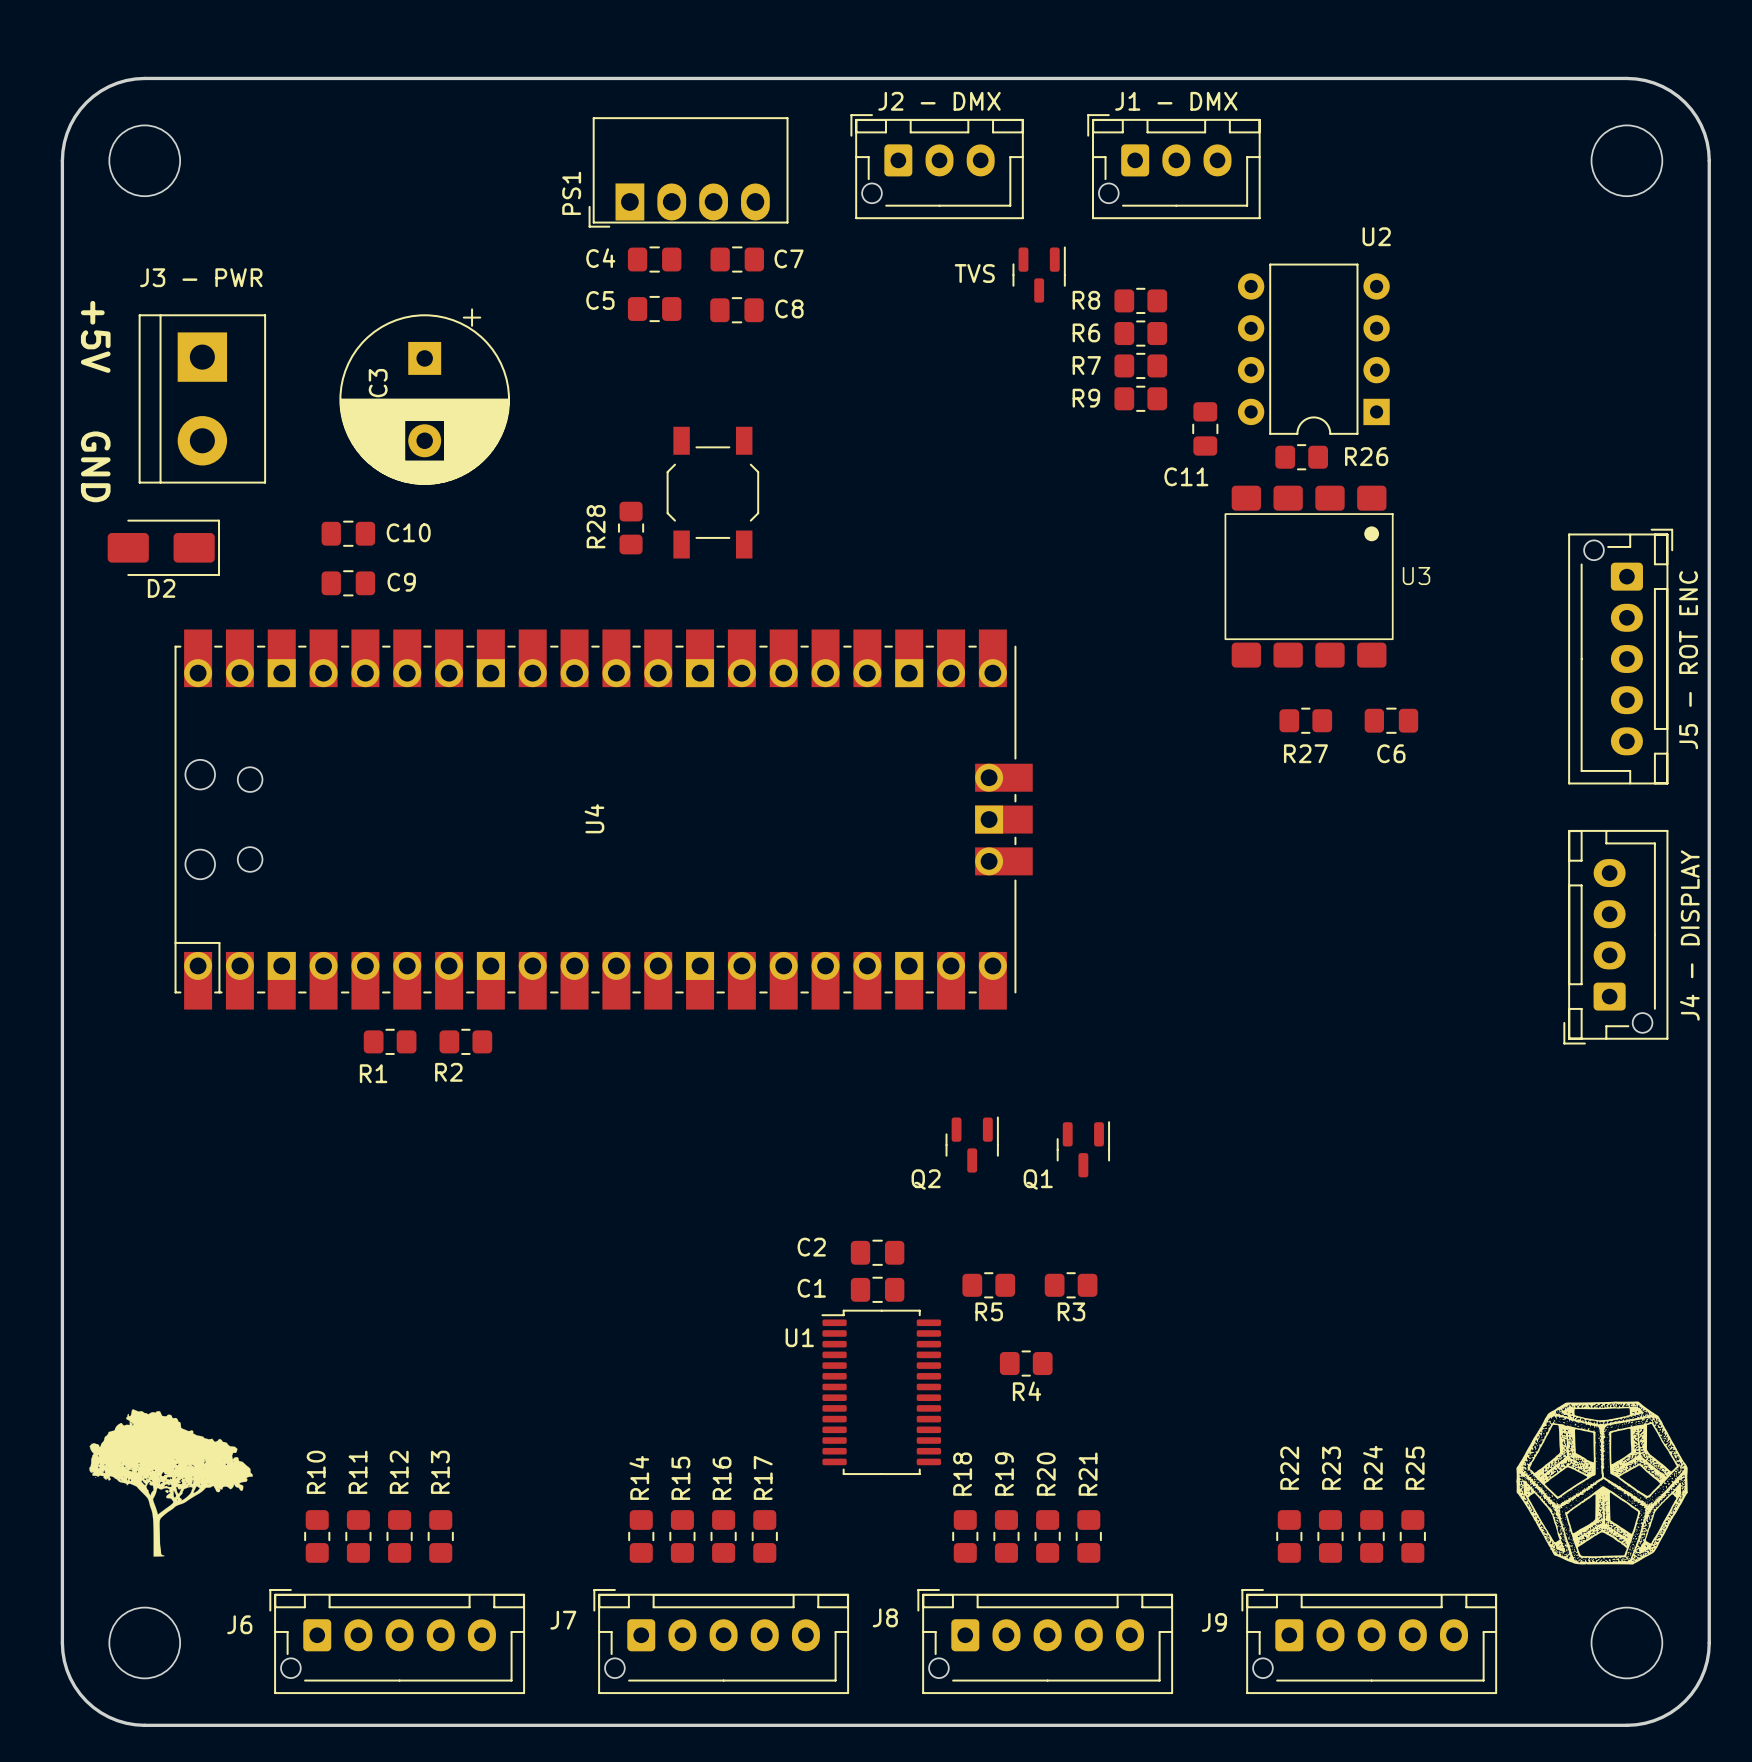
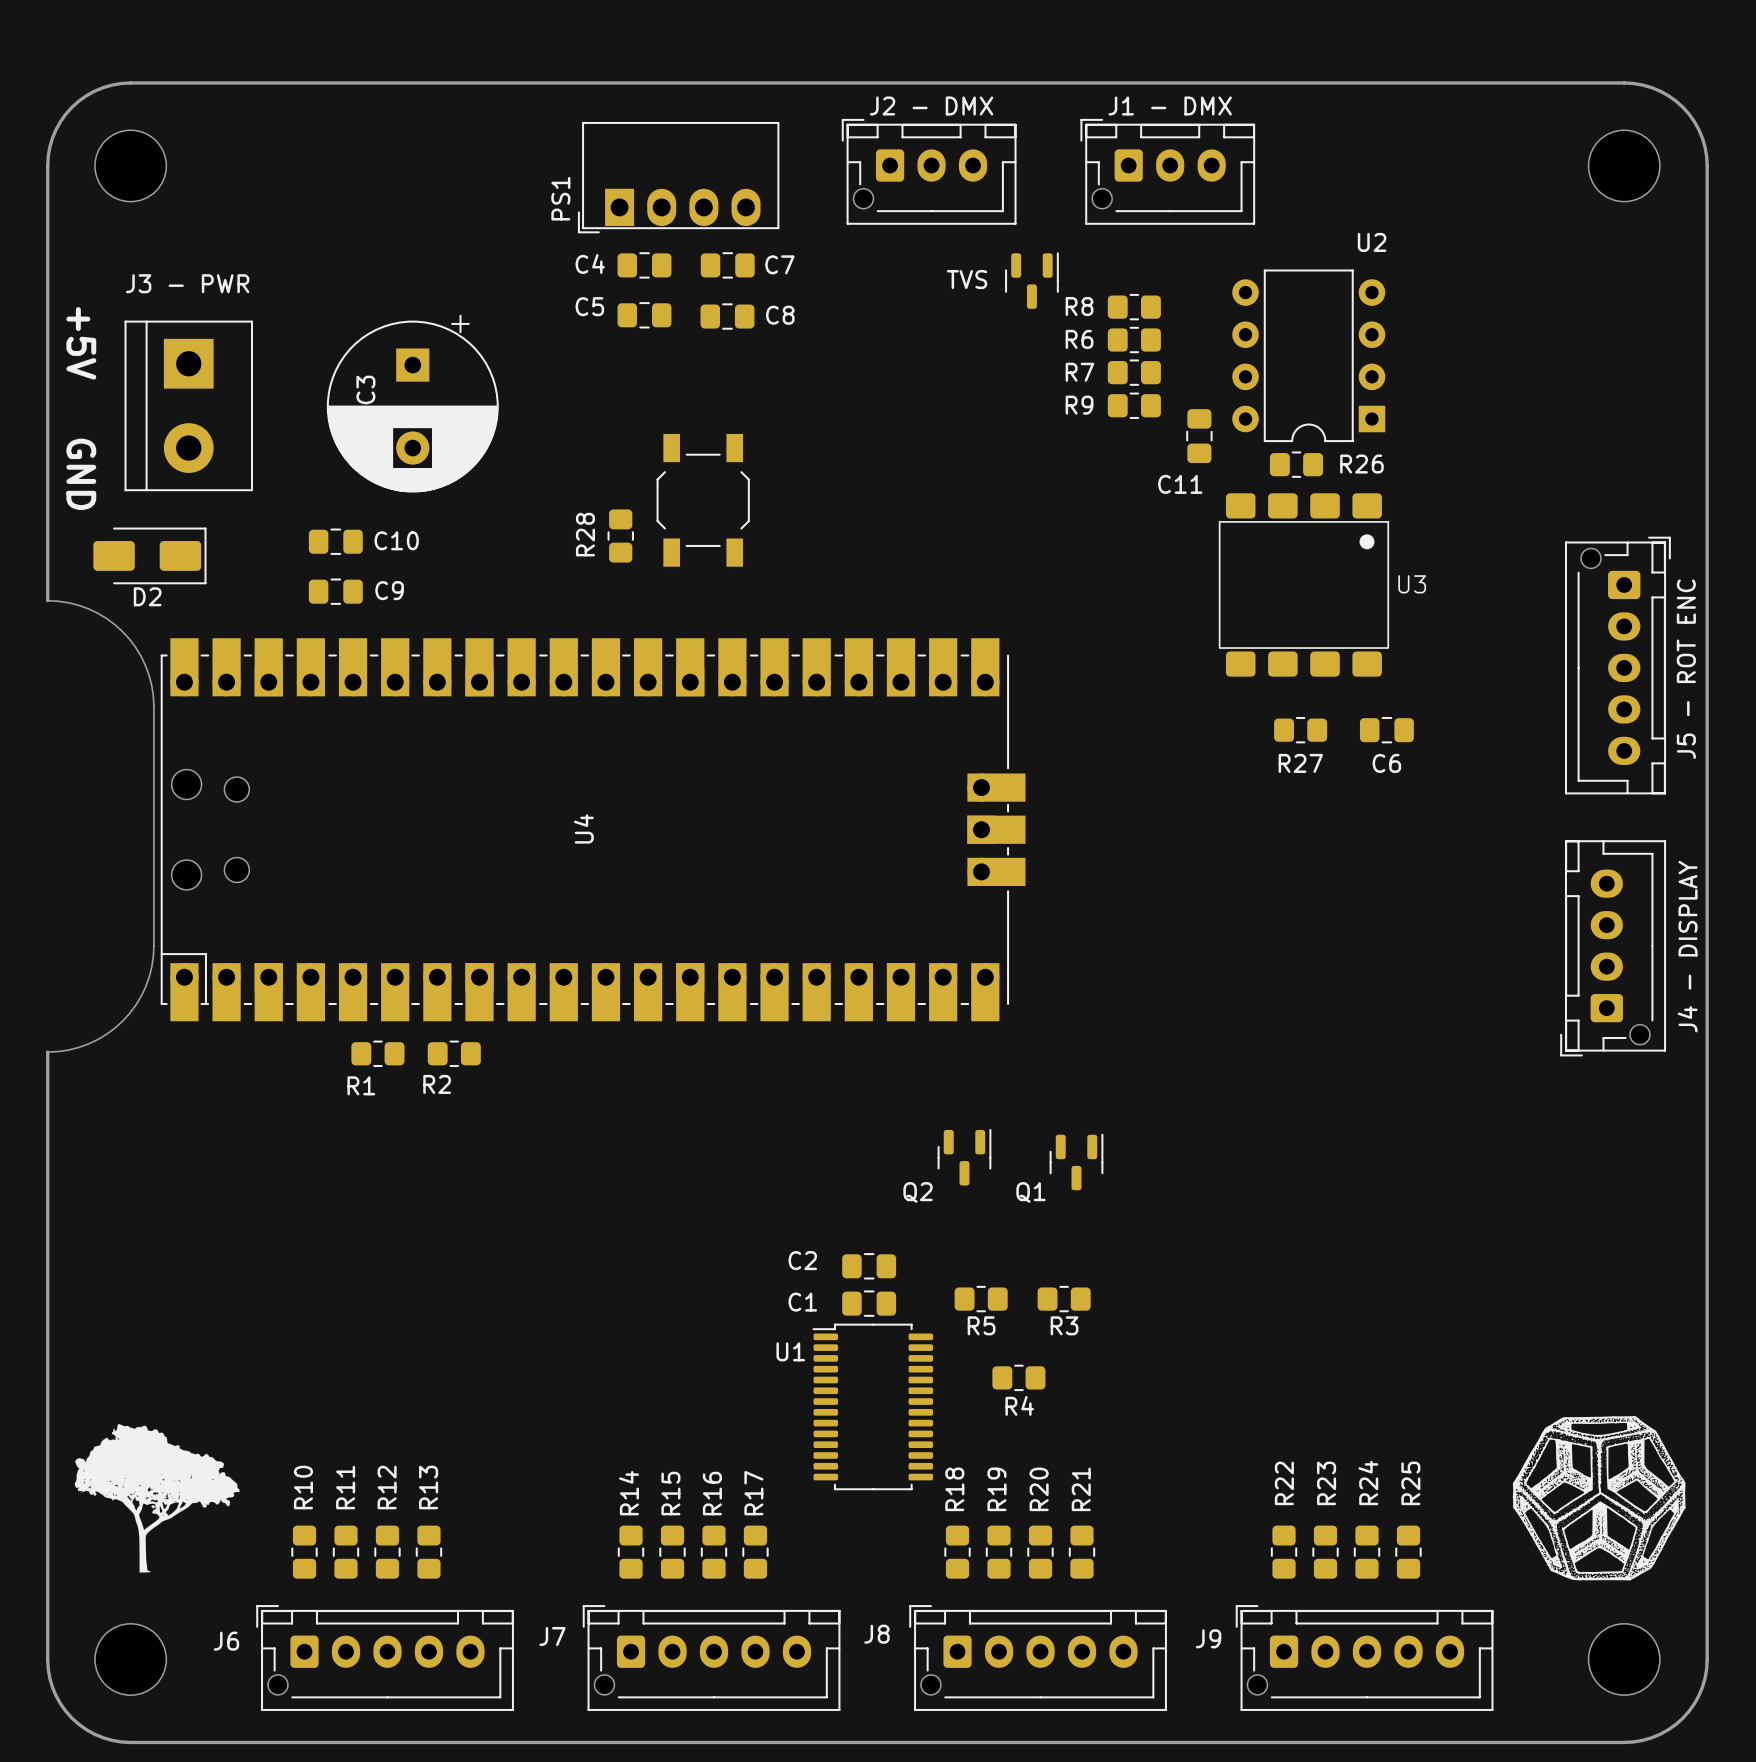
board edge: (62, 592) (62, 1040) -> (47, 600) (68, 602) (87, 608) (106, 618) (122, 631) (135, 647) (145, 665) (151, 684) (153, 705) (153, 945) (149, 976) (136, 1004) (115, 1028) (88, 1044) (68, 1050) (47, 1052)

